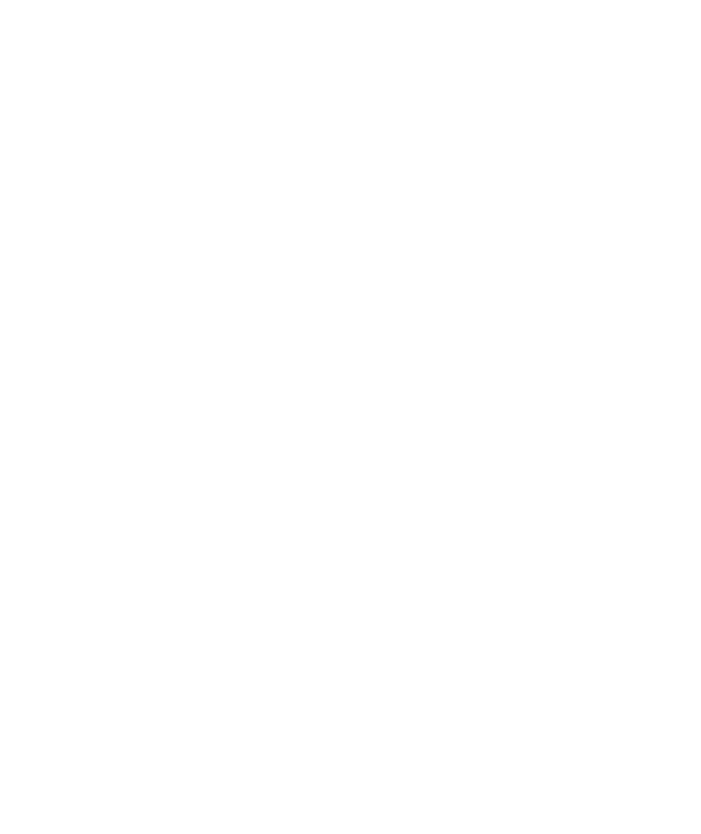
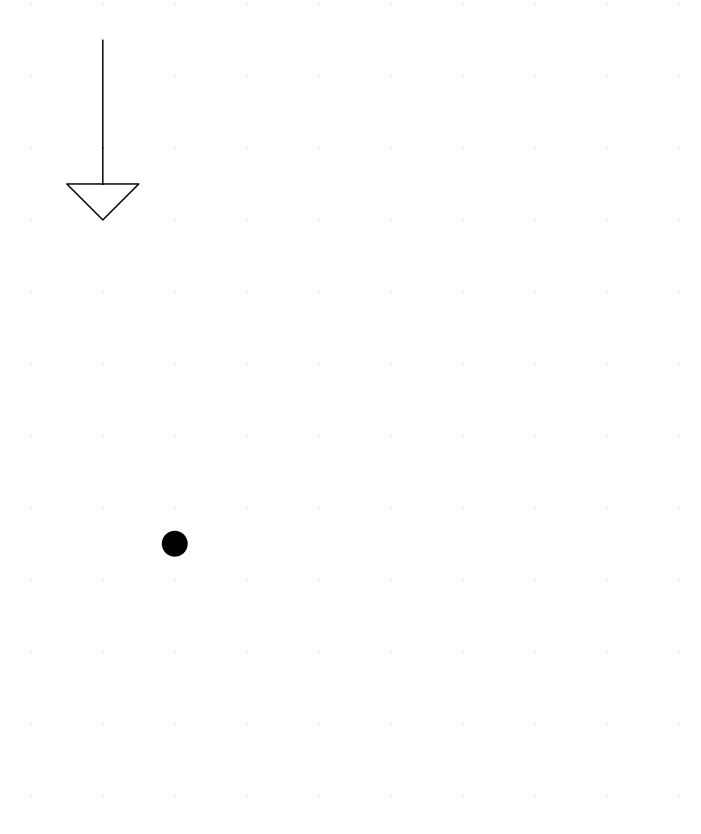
wire: none -> (102, 40) (102, 147)
power symbol: none -> (102, 183)
junction: none -> (174, 543)

